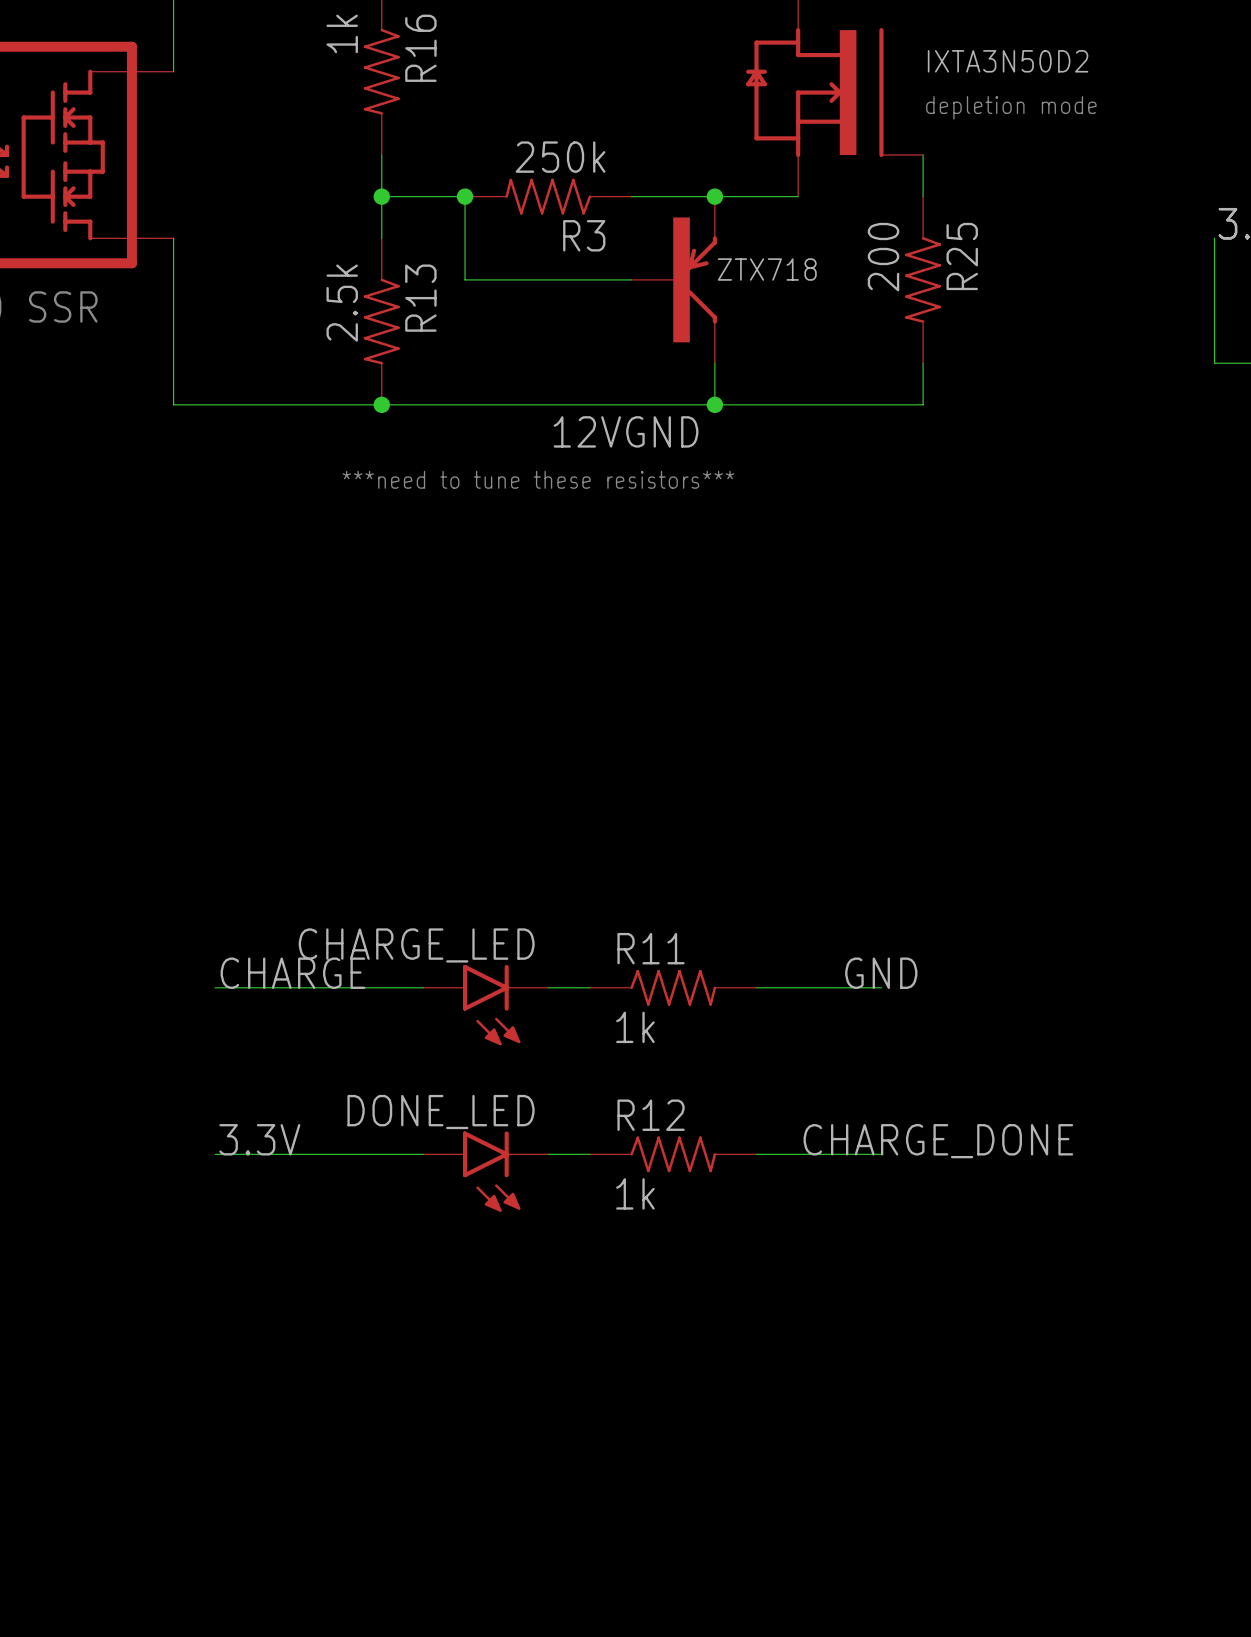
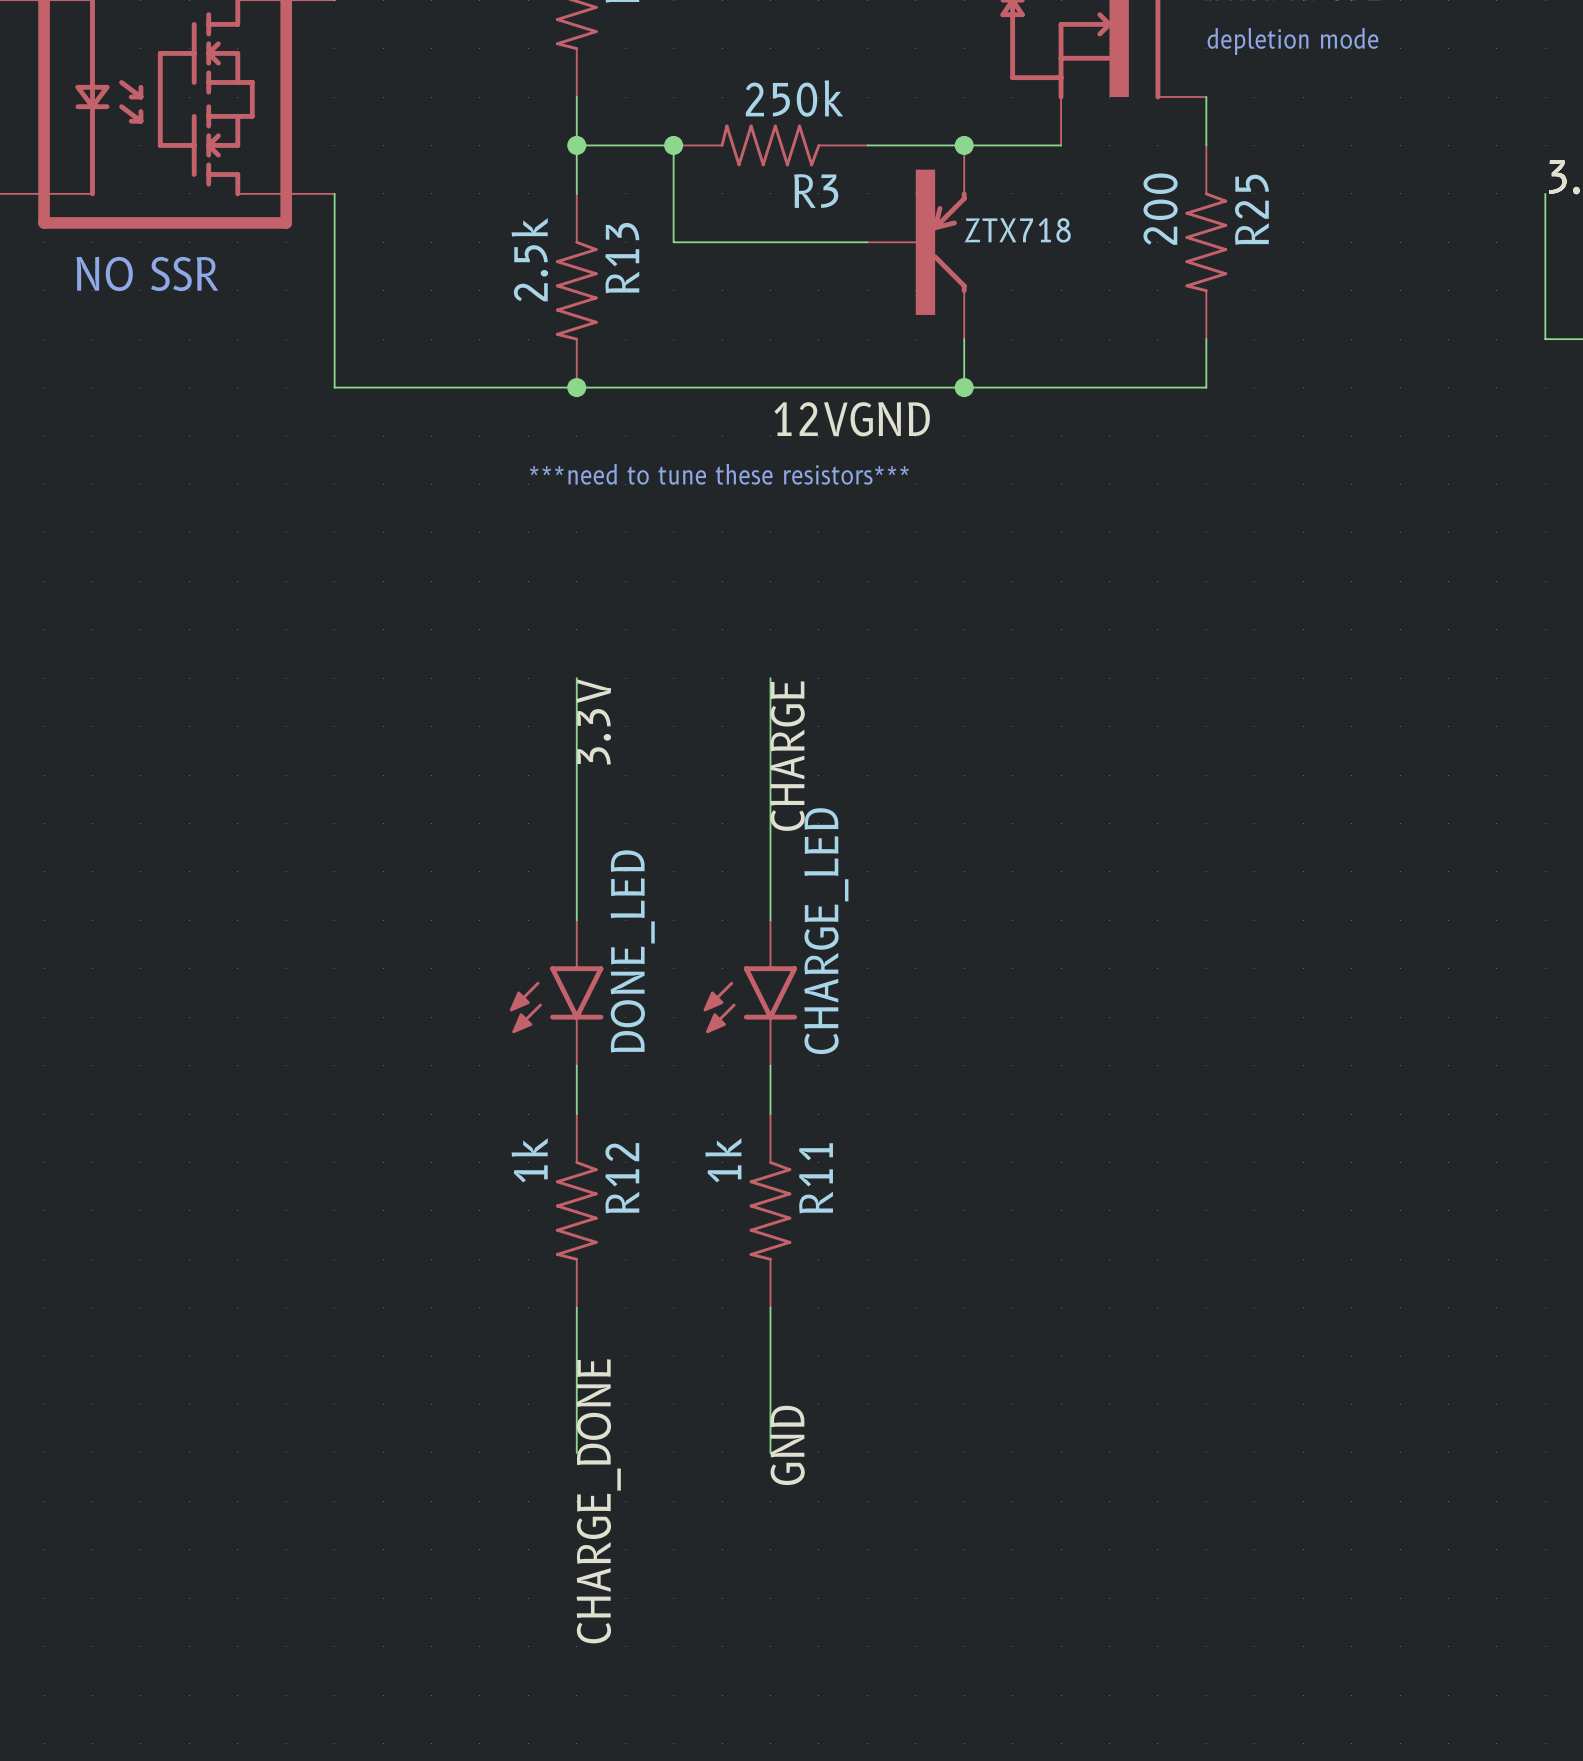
wire: none -> (576, 678) (576, 920)
wire: none -> (770, 678) (770, 920)
label: none -> 3.3V (593, 721)
label: none -> CHARGE (787, 756)
label: CHARGE (292, 973) -> none
label: GND (881, 973) -> none
wire: (215, 987) (423, 987) -> none
wire: none -> (576, 1065) (576, 1114)
wire: (548, 987) (589, 987) -> (770, 1065) (770, 1114)
R11 rotation: 0° (673, 987) -> 90° clockwise (770, 1210)
R11 position: (673, 987) -> (770, 1210)
wire: (756, 987) (881, 987) -> none
CHARGE_LED position: (485, 1005) -> (750, 992)
CHARGE_LED rotation: 0° (491, 1005) -> 90° clockwise (750, 999)
label: 3.3V (259, 1139) -> none
label: CHARGE_DONE (938, 1141) -> none
wire: (215, 1154) (423, 1154) -> none
wire: (548, 1154) (589, 1154) -> none
R12 rotation: 0° (673, 1154) -> 90° clockwise (576, 1210)
R12 position: (673, 1154) -> (576, 1210)
wire: (756, 1154) (881, 1154) -> none
DONE_LED position: (485, 1171) -> (556, 992)
DONE_LED rotation: 0° (491, 1171) -> 90° clockwise (556, 999)
wire: none -> (576, 1307) (576, 1452)
wire: none -> (770, 1307) (770, 1452)
label: none -> GND (787, 1445)
label: none -> CHARGE_DONE (598, 1501)

